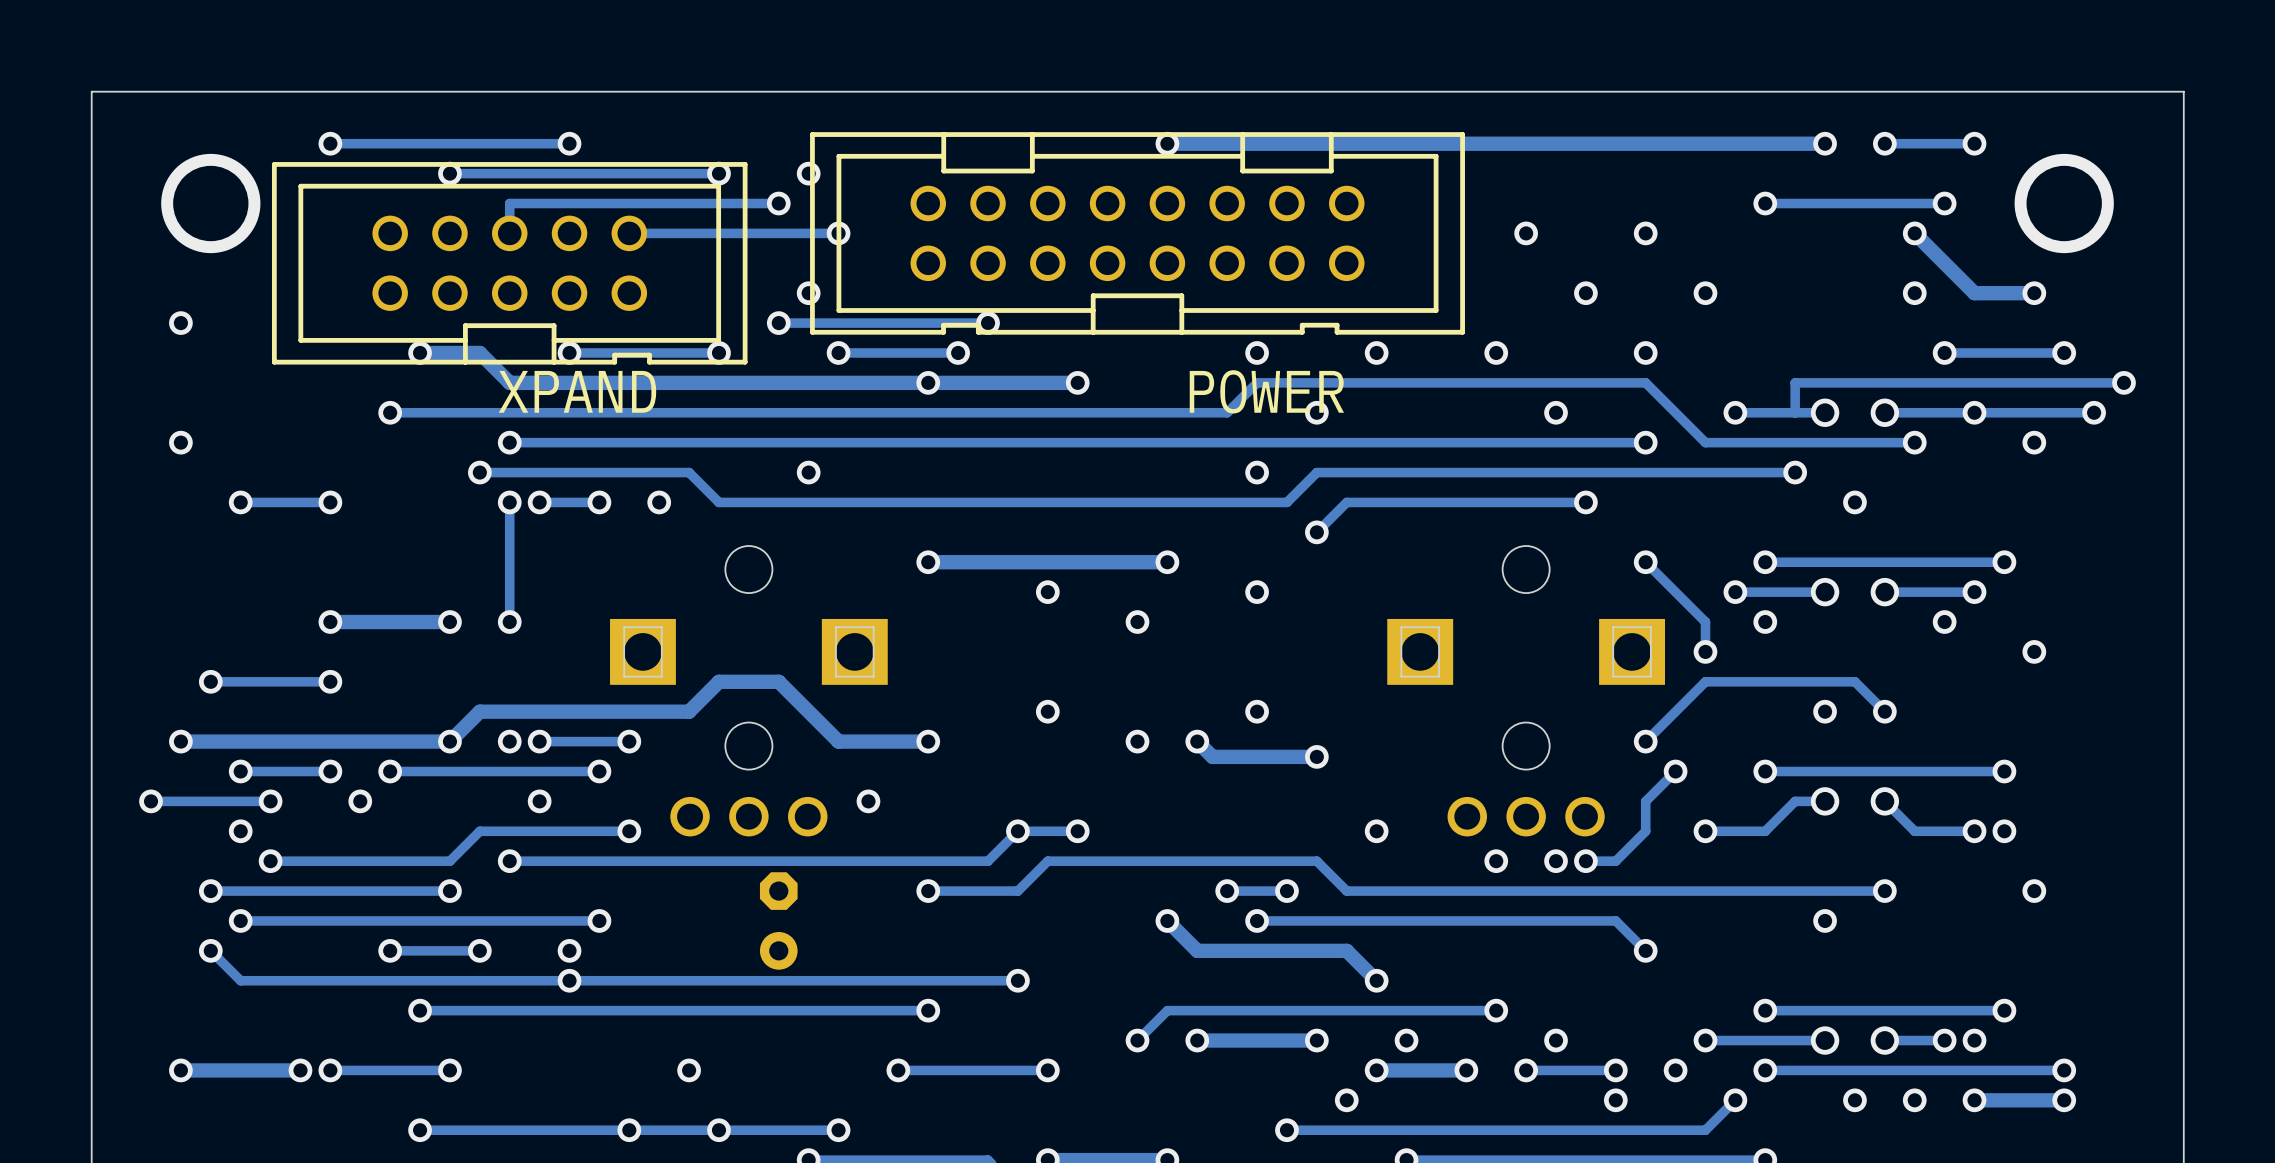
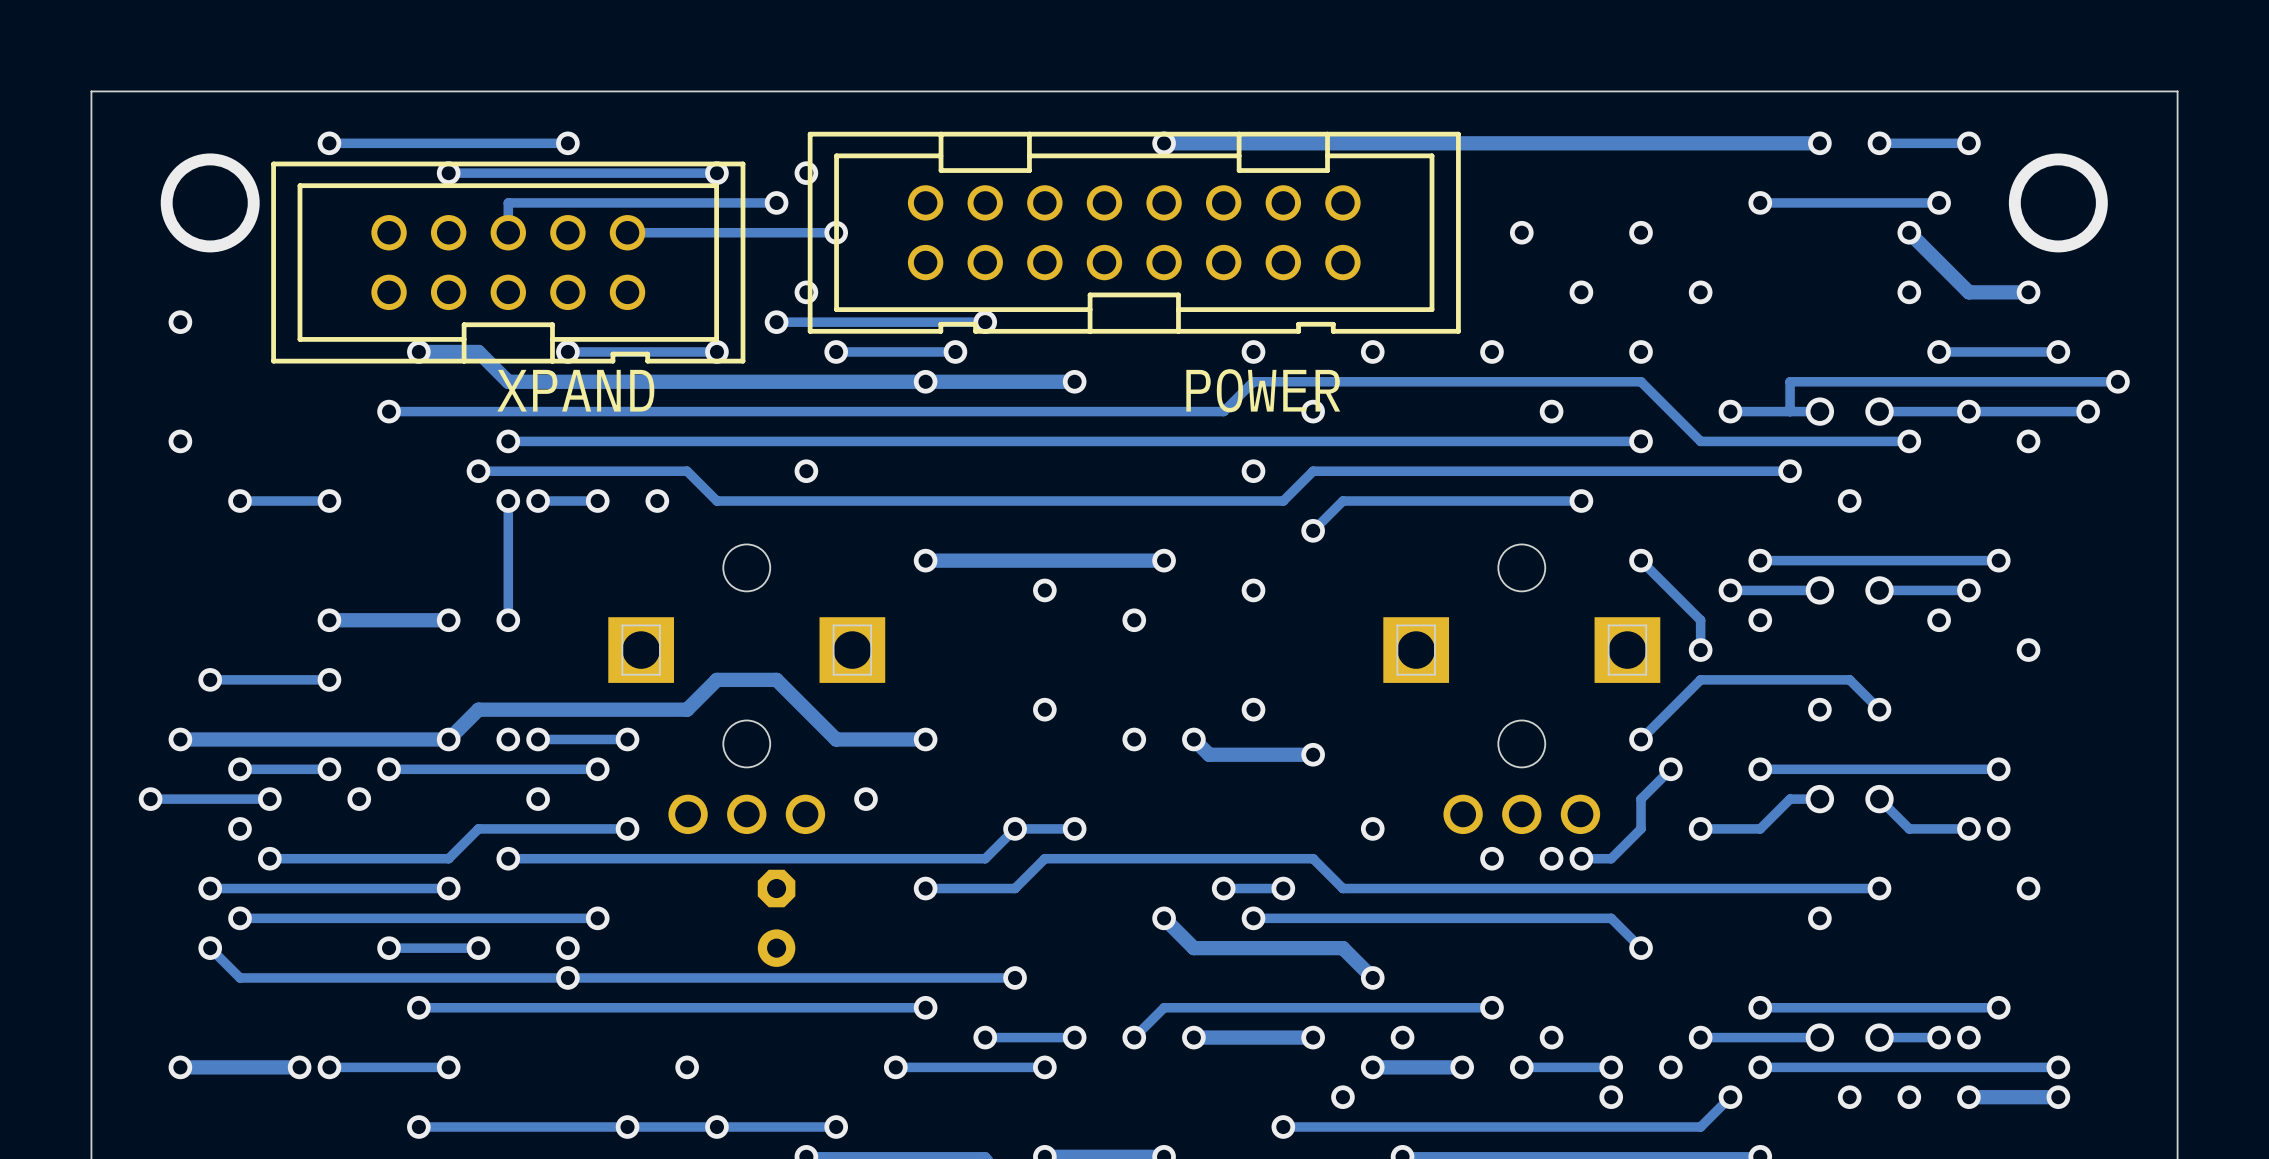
via: none -> (985, 1037)
track: none -> (1074, 1037) (985, 1037)
via: none -> (1074, 1037)

